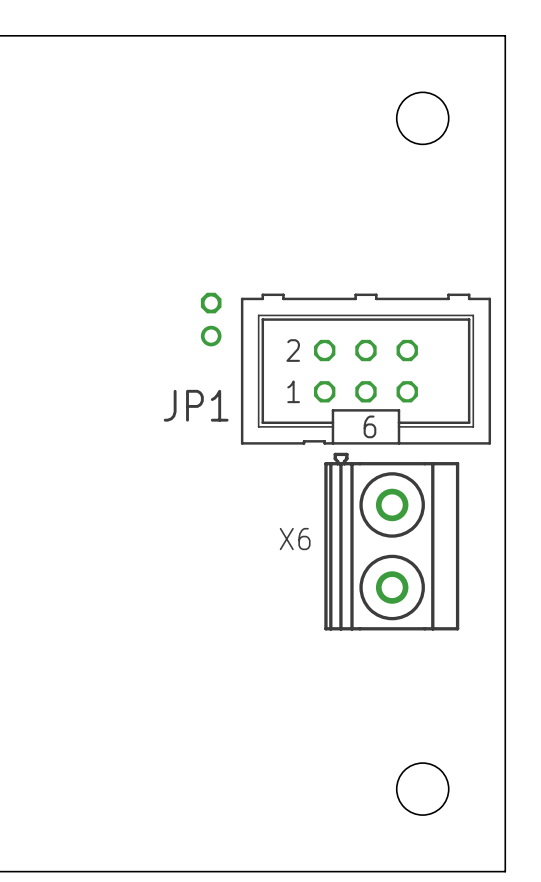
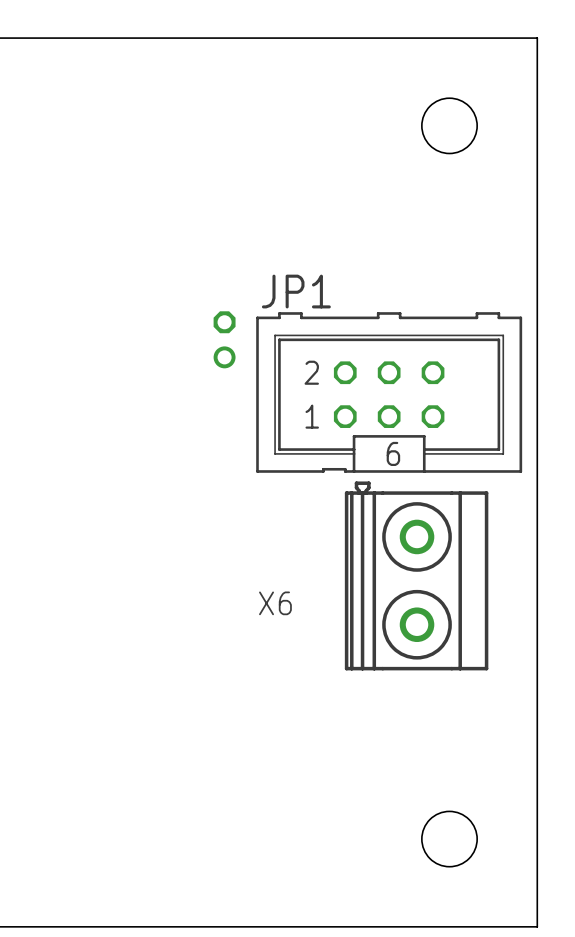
JP1 name position: JP1 (196, 405) -> JP1 (296, 291)
X6 name position: X6 (295, 539) -> X6 (275, 603)

